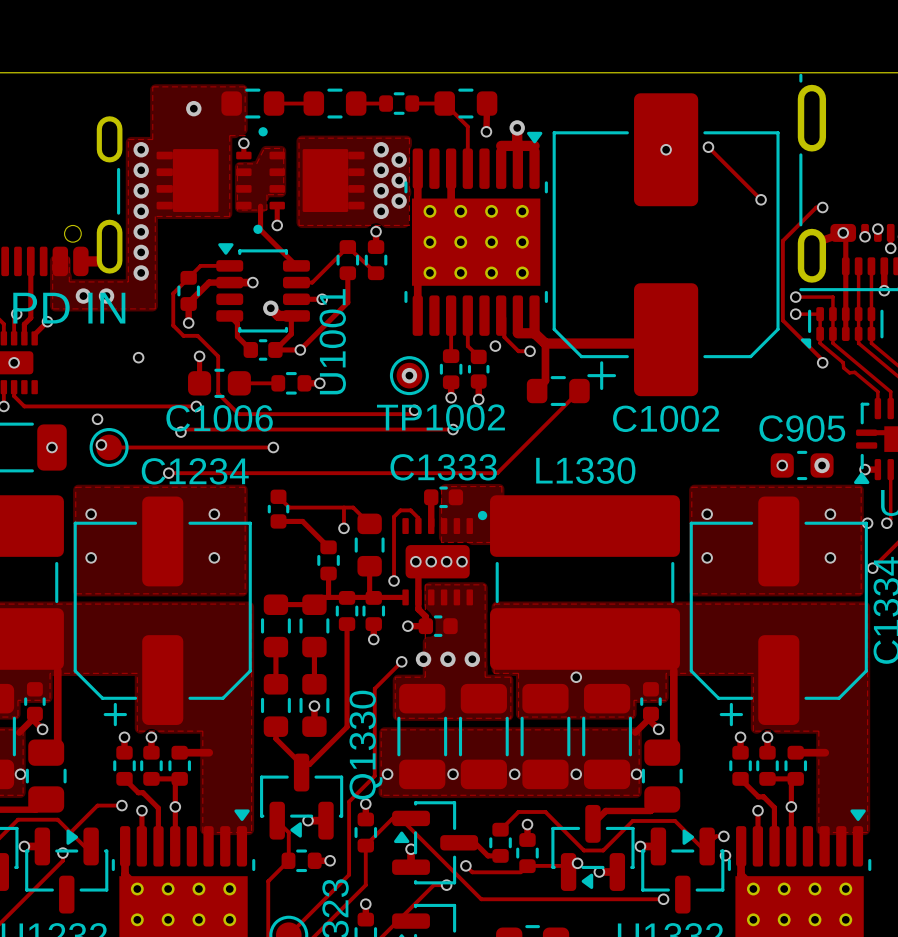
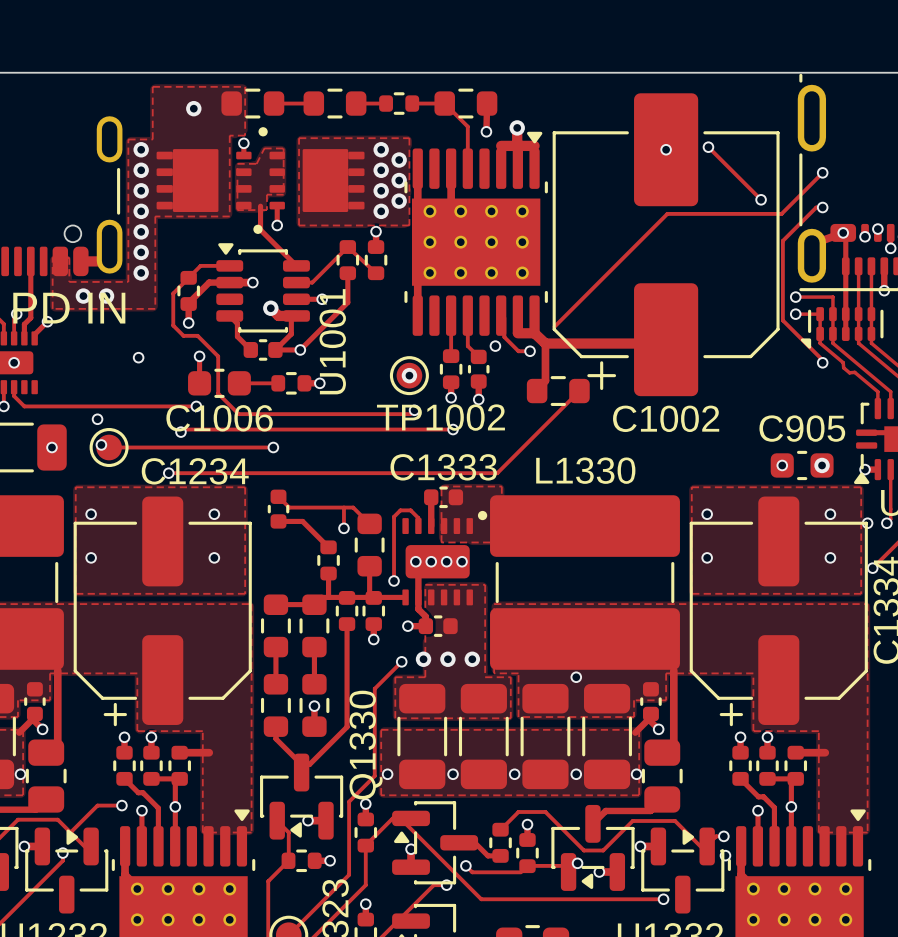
track: none -> (822, 172) (781, 213) (667, 213) (554, 326)
via: none -> (822, 172)

